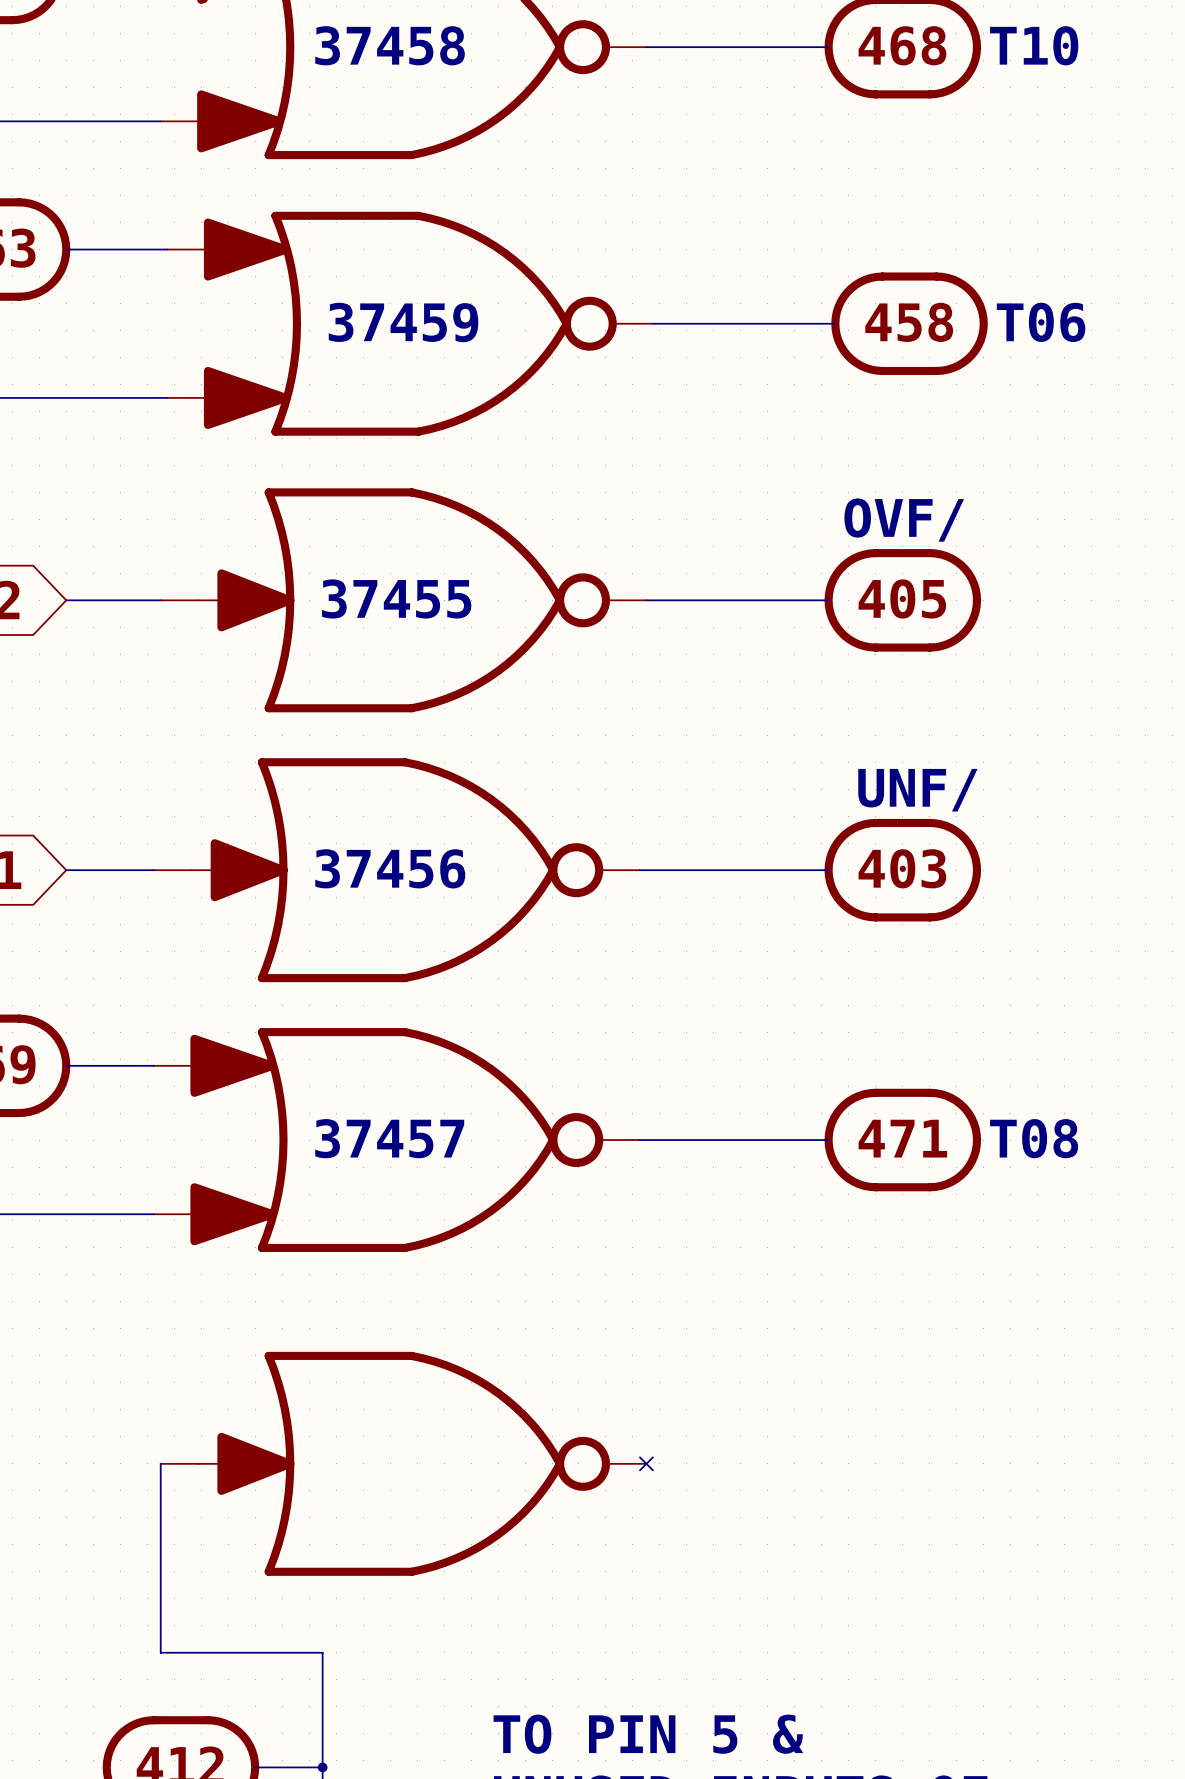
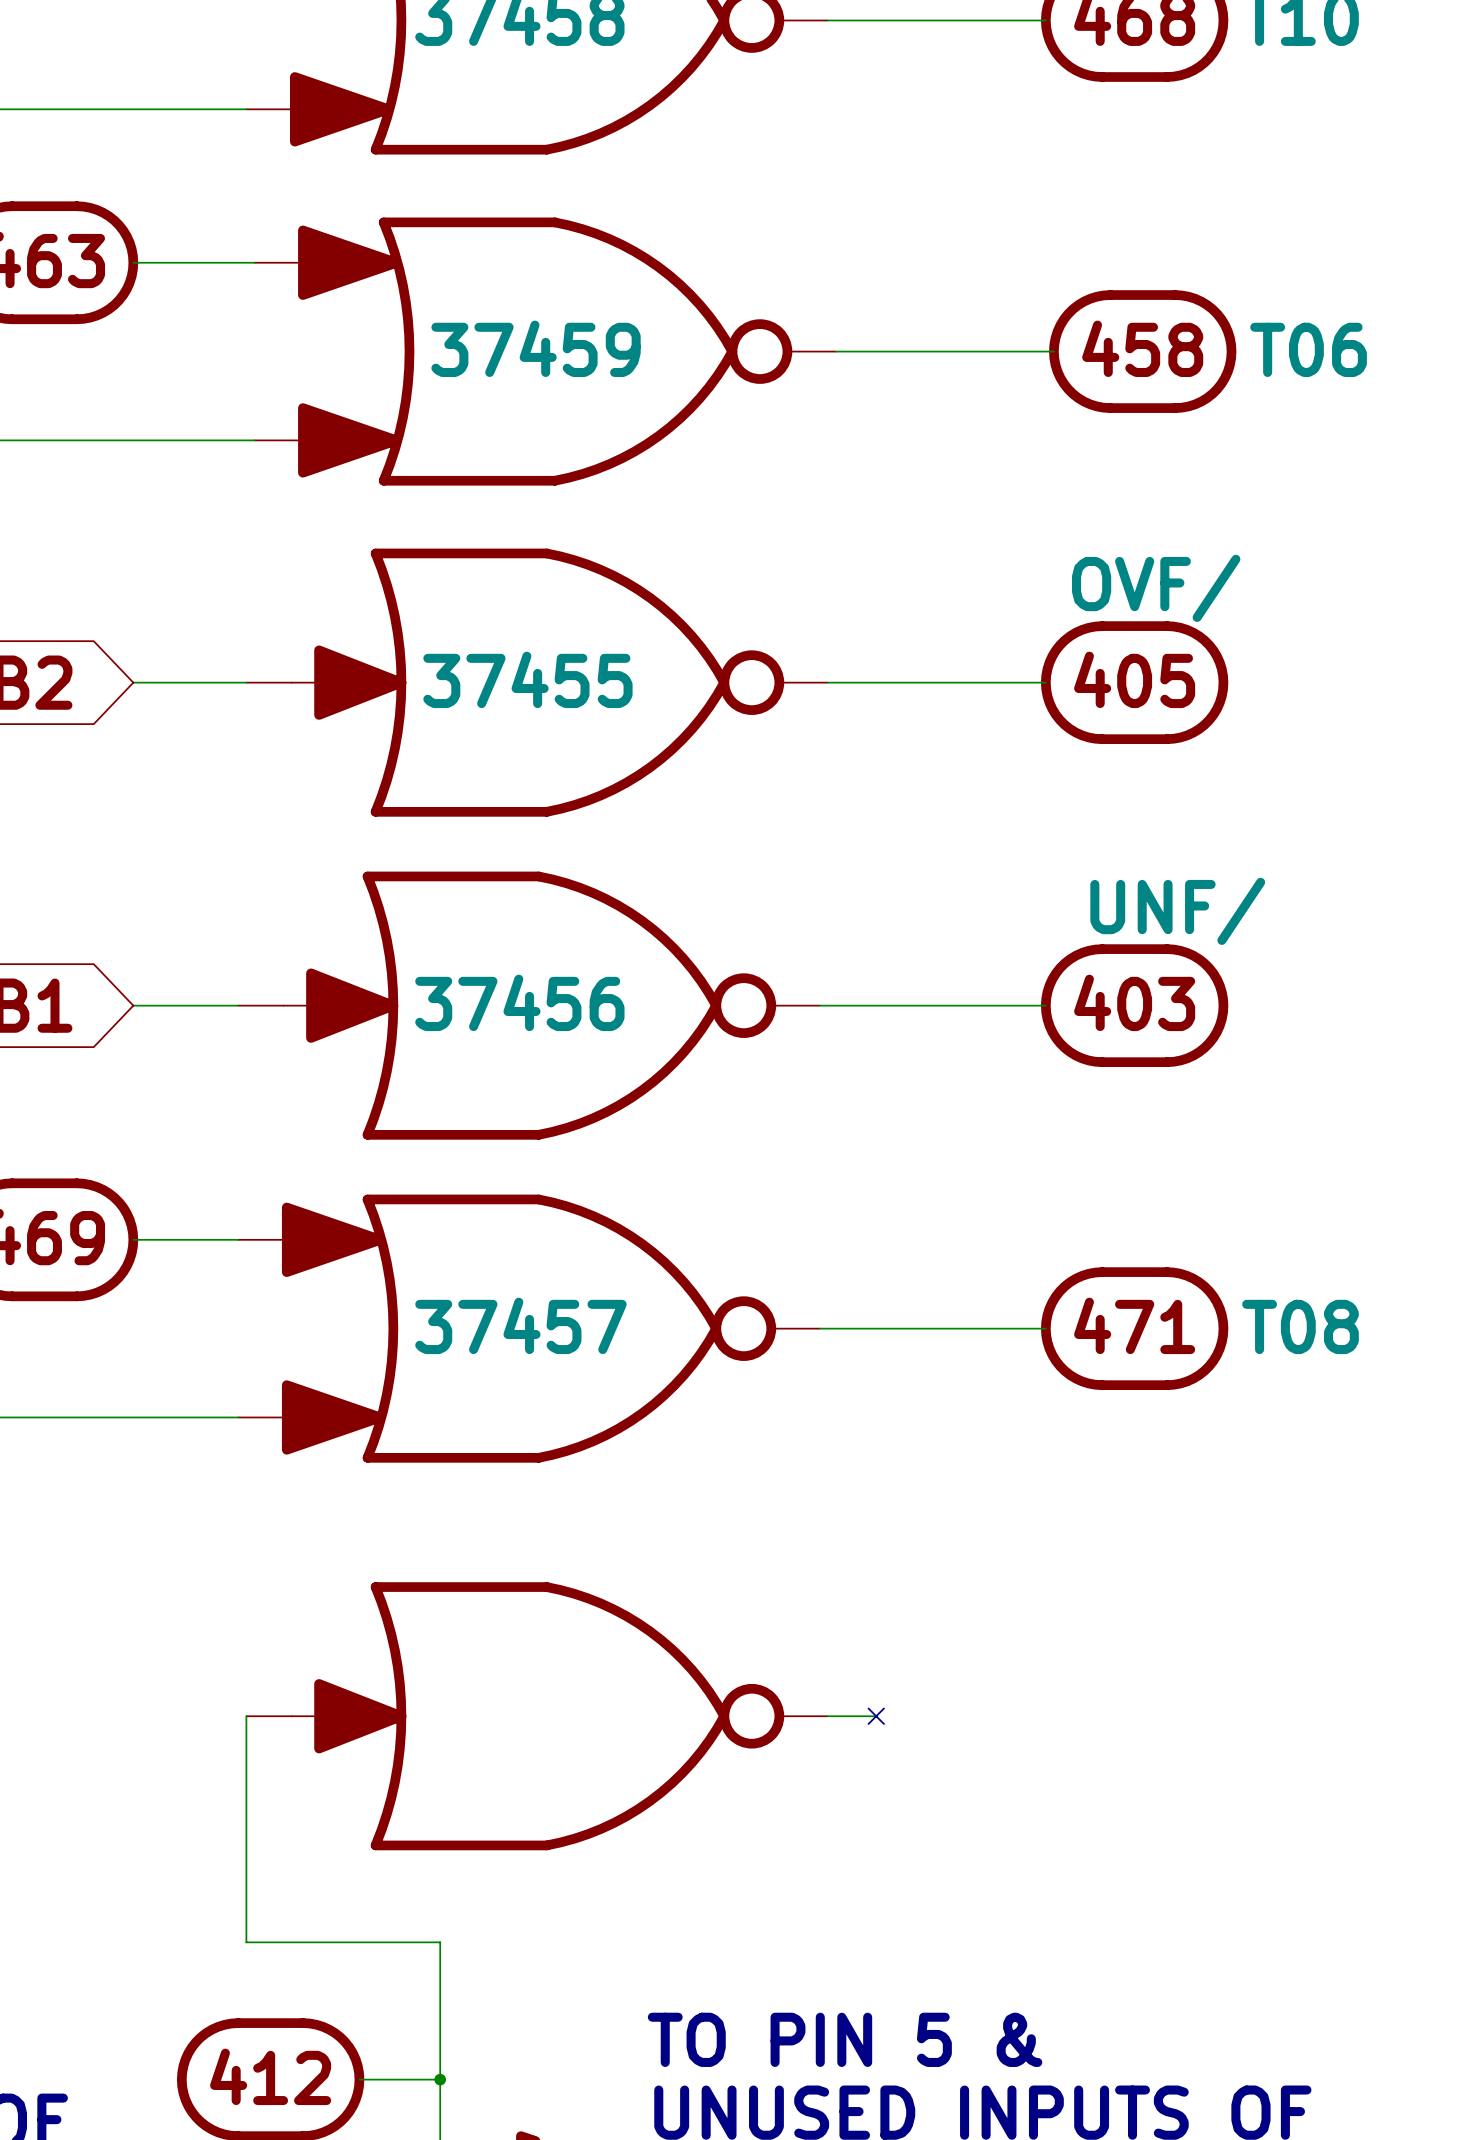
wire: none -> (827, 1716) (876, 1716)
no-connect mark position: (646, 1463) -> (876, 1716)

